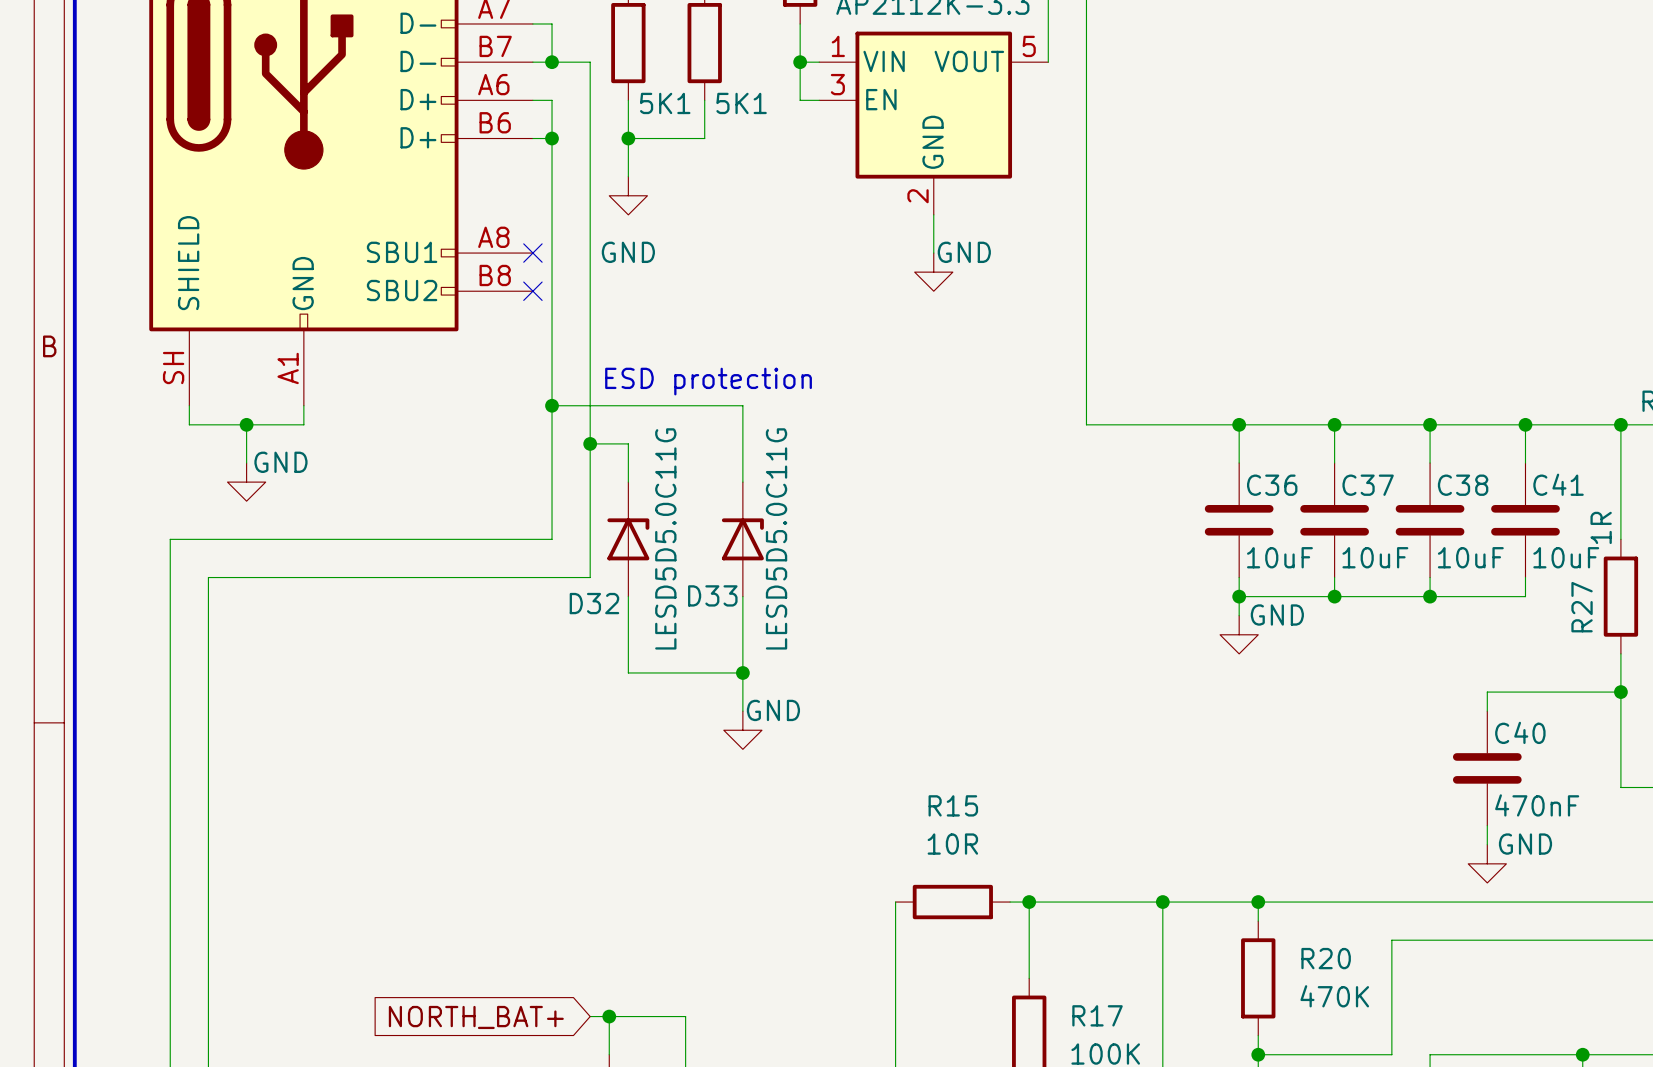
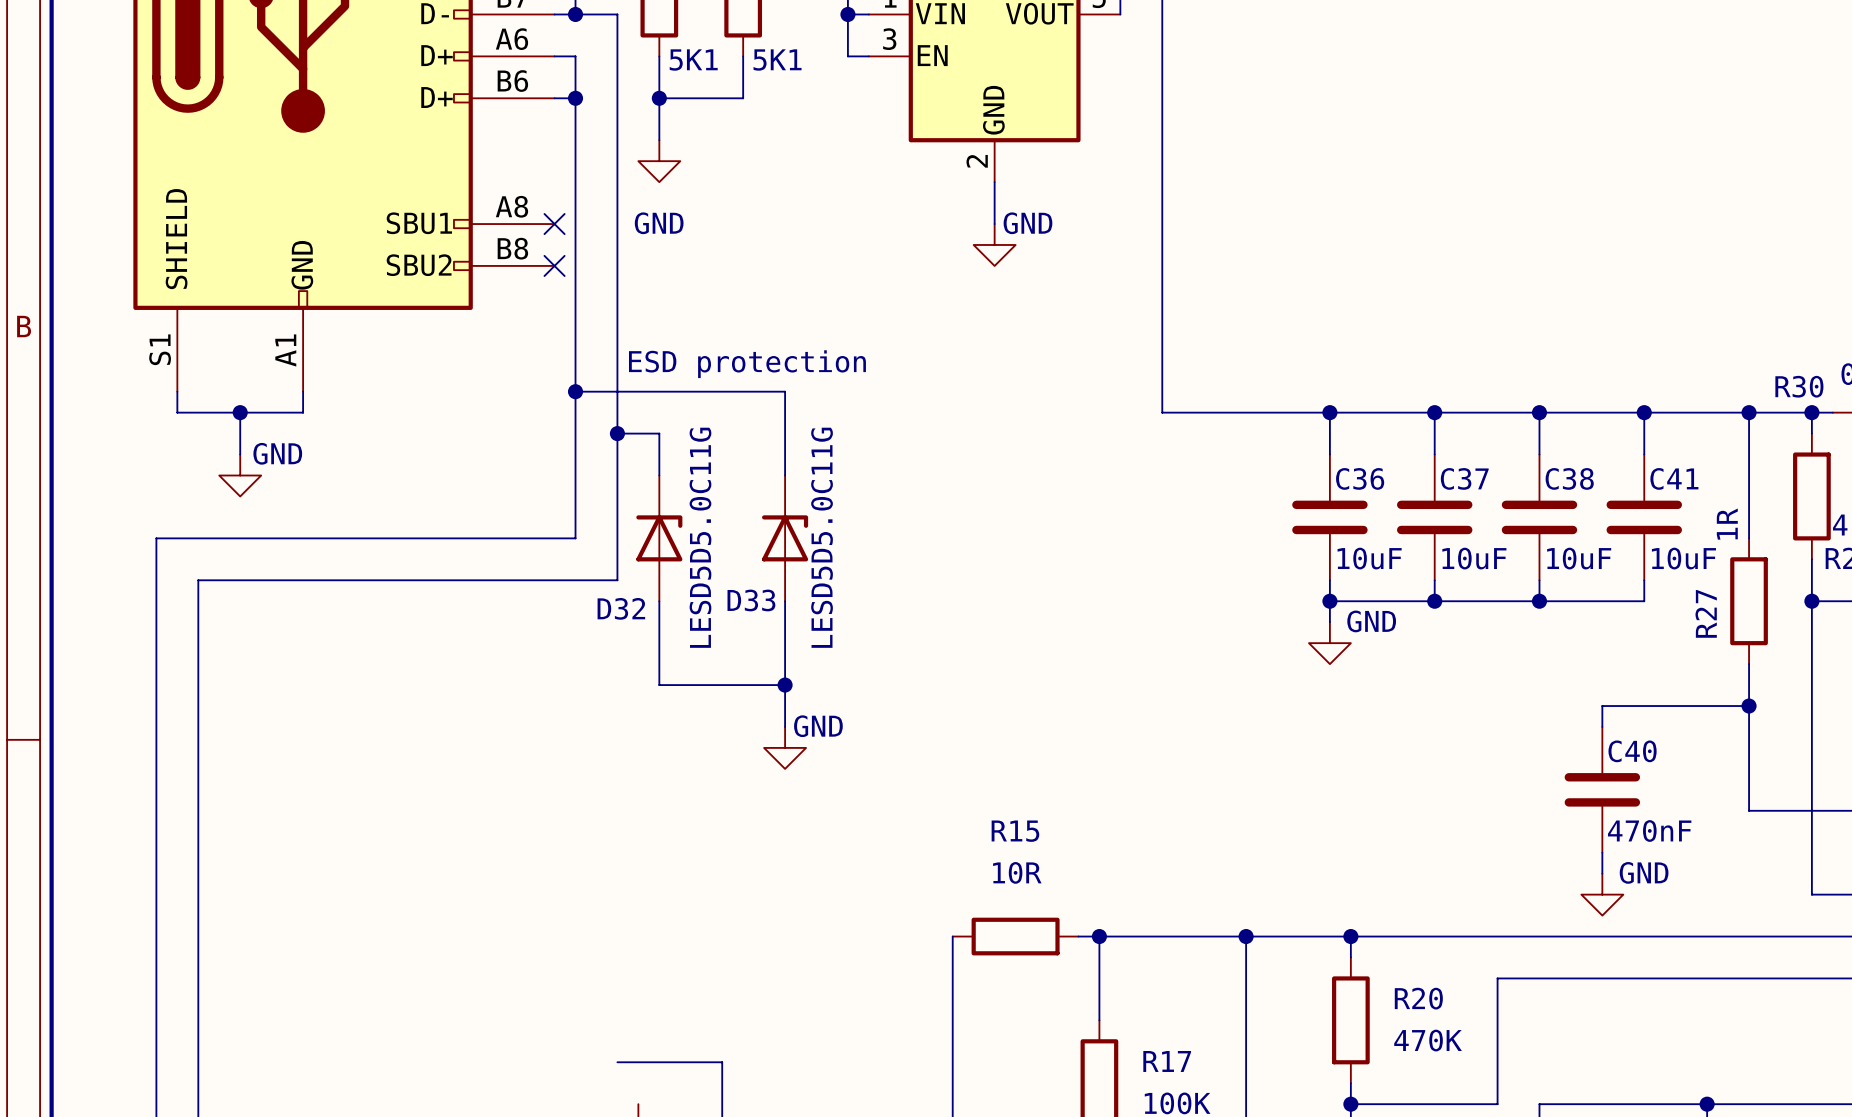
part pin number: SH (173, 368) -> S1 (160, 349)
wire: (609, 1016) (609, 1054) -> none
junction: (609, 1016) -> none
global label: NORTH_BAT+ (476, 1017) -> none

